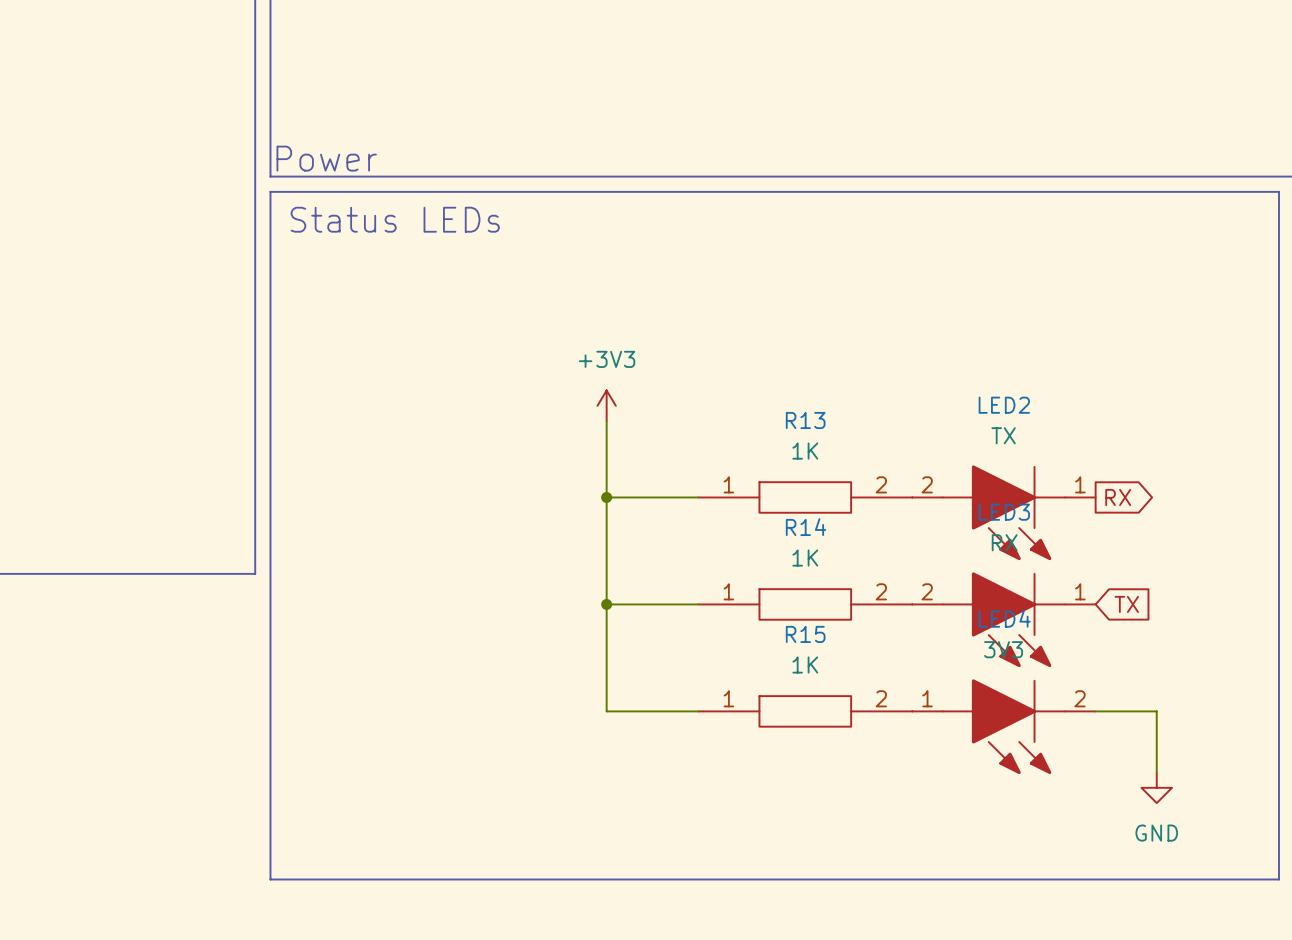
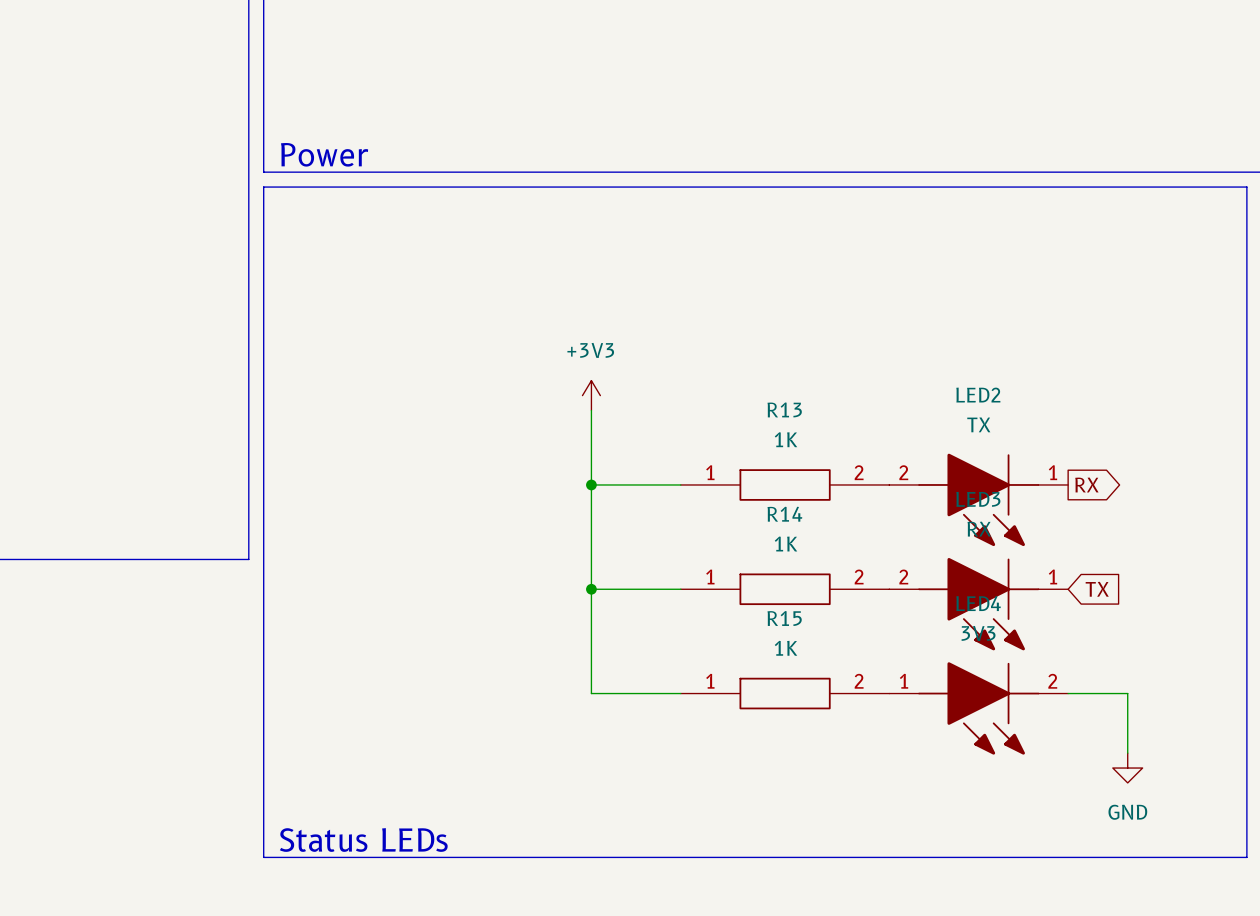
text position: Power (326, 158) -> Power (324, 154)
text: Status LEDs (395, 219) -> none
text: none -> Status LEDs (363, 840)

